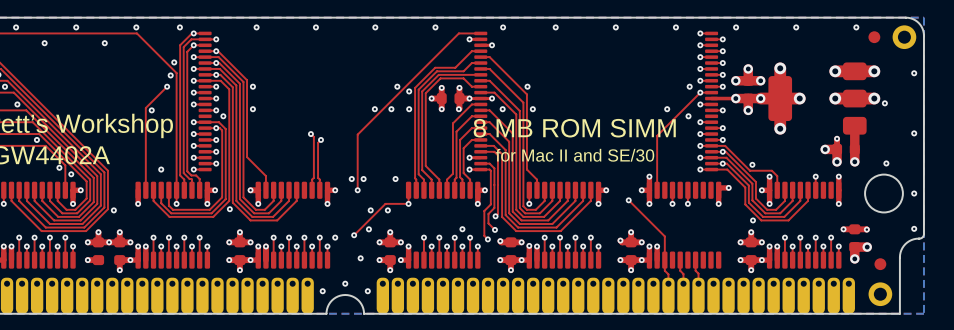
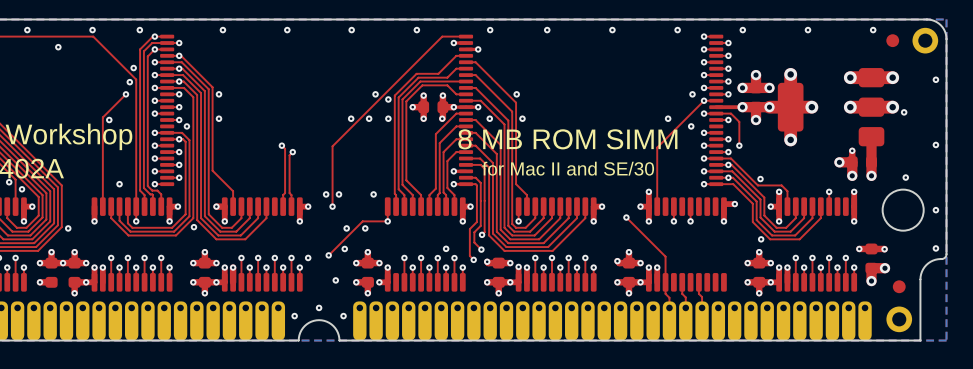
top track: none -> (716, 113) (731, 113) (739, 121) (739, 145)
via: none -> (739, 145)

